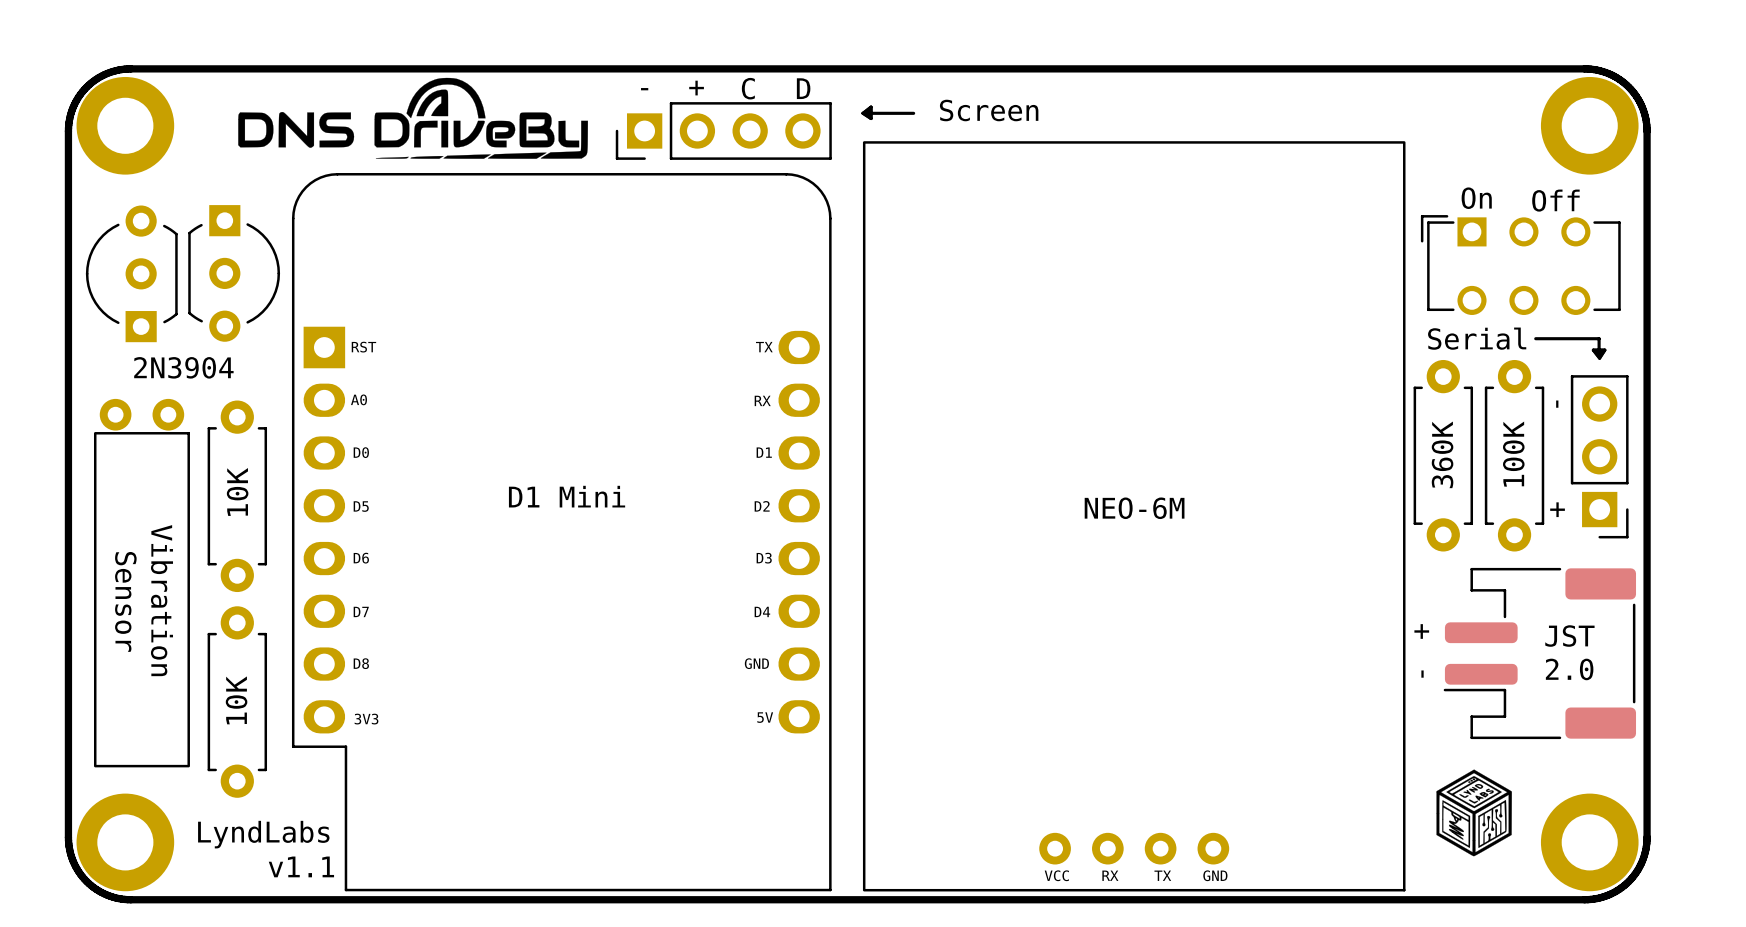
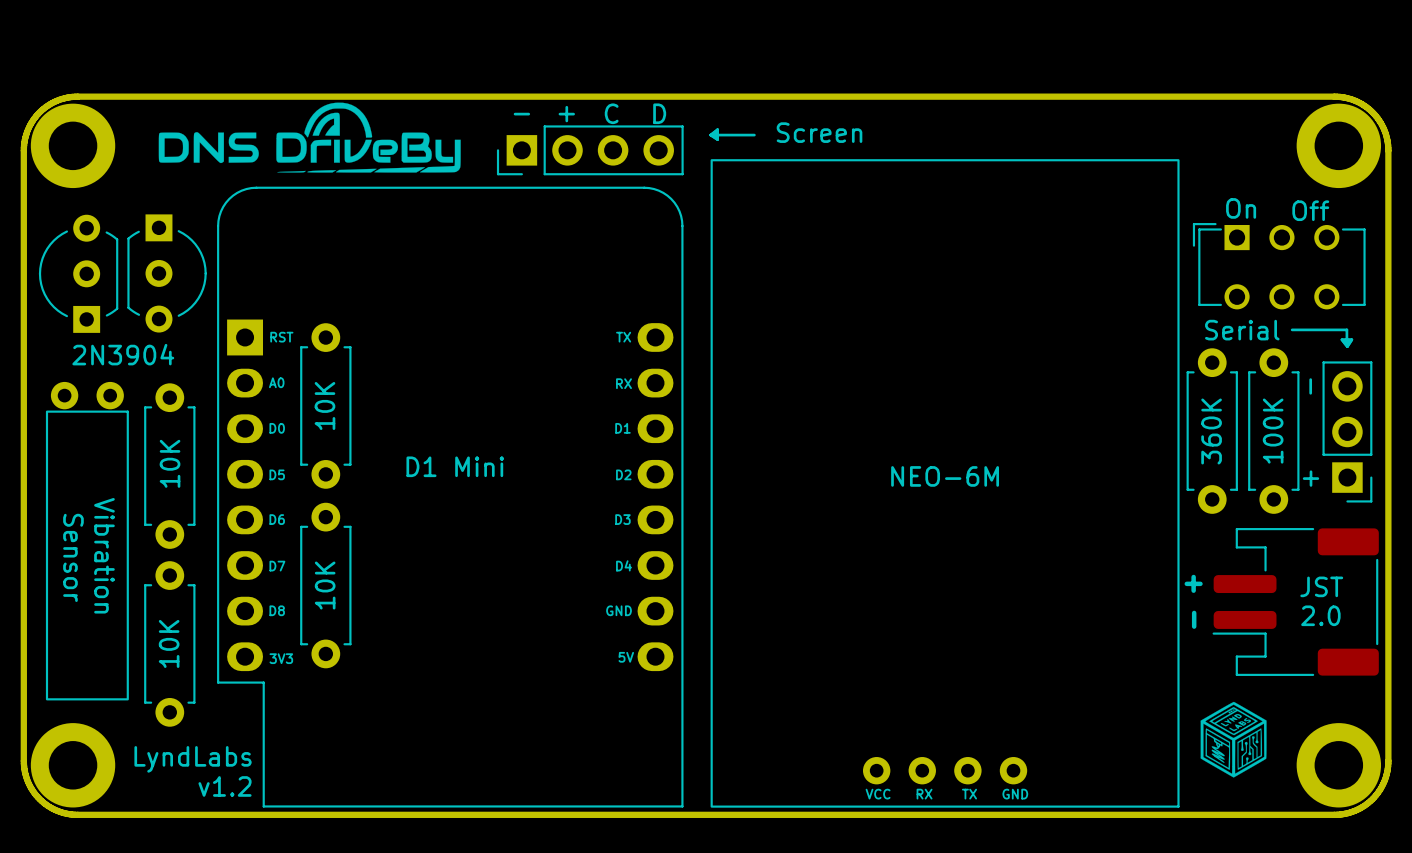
drawing shape: [238, 77, 1512, 857] -> [158, 102, 1267, 778]
part: none -> 10K (325, 405)
part: none -> 10K (325, 585)
text: v1.1 (301, 866) -> v1.2 (225, 786)

